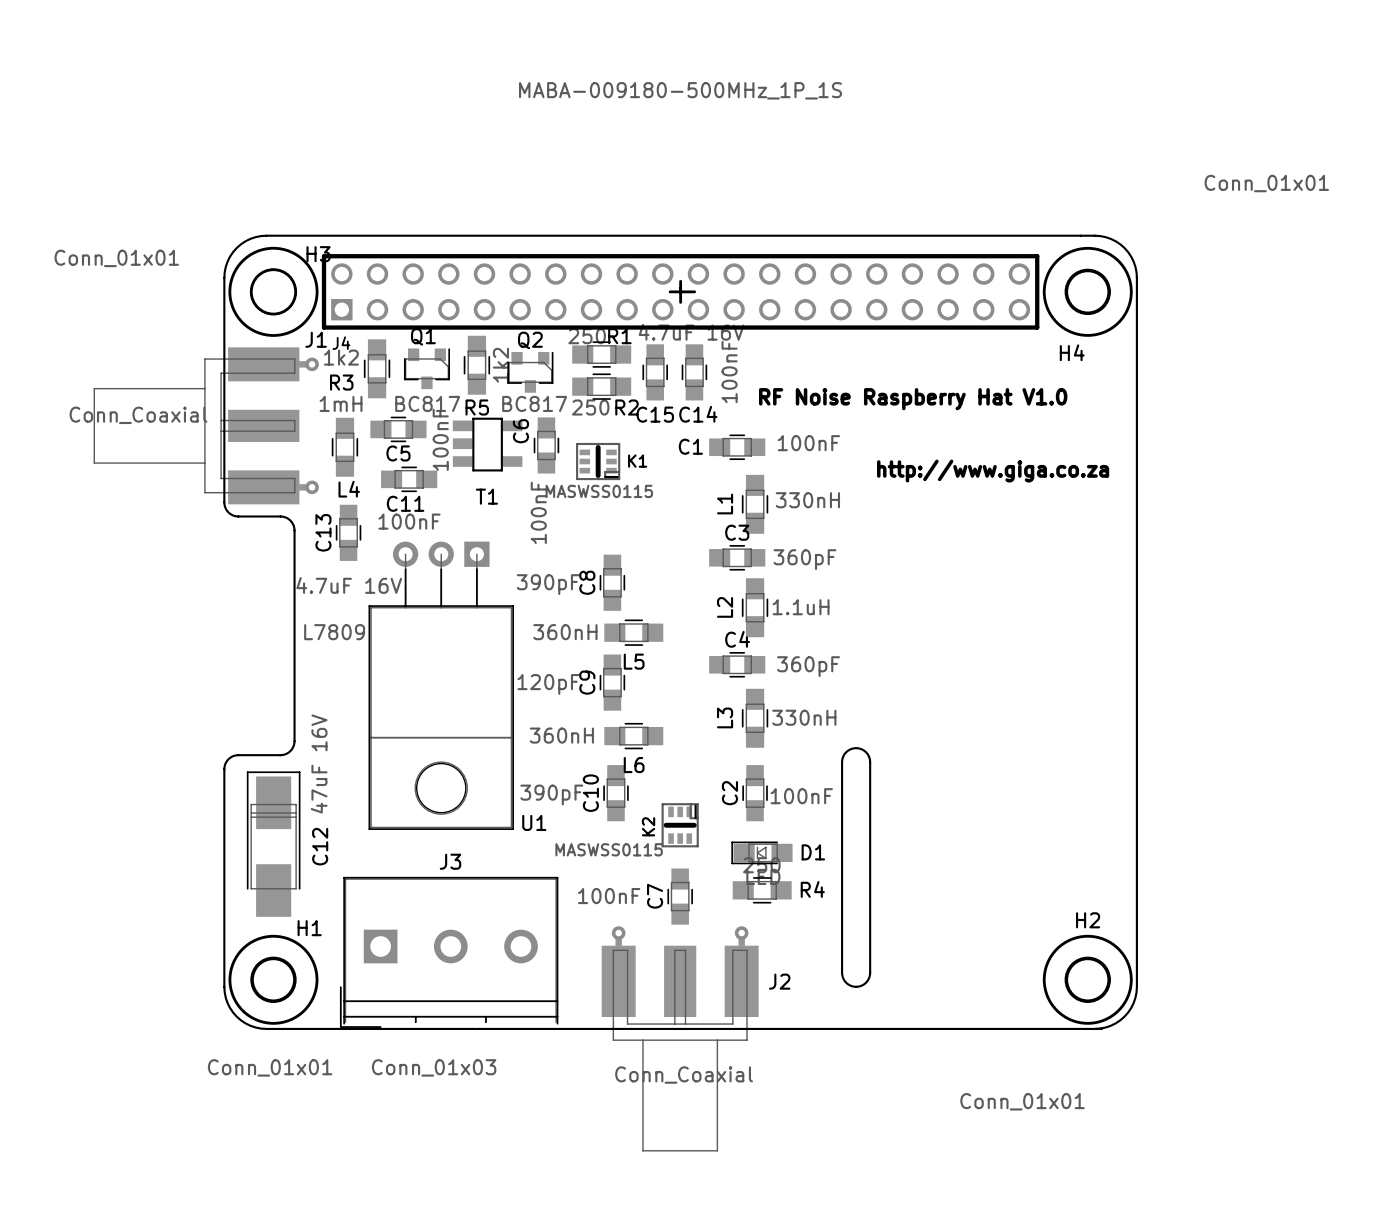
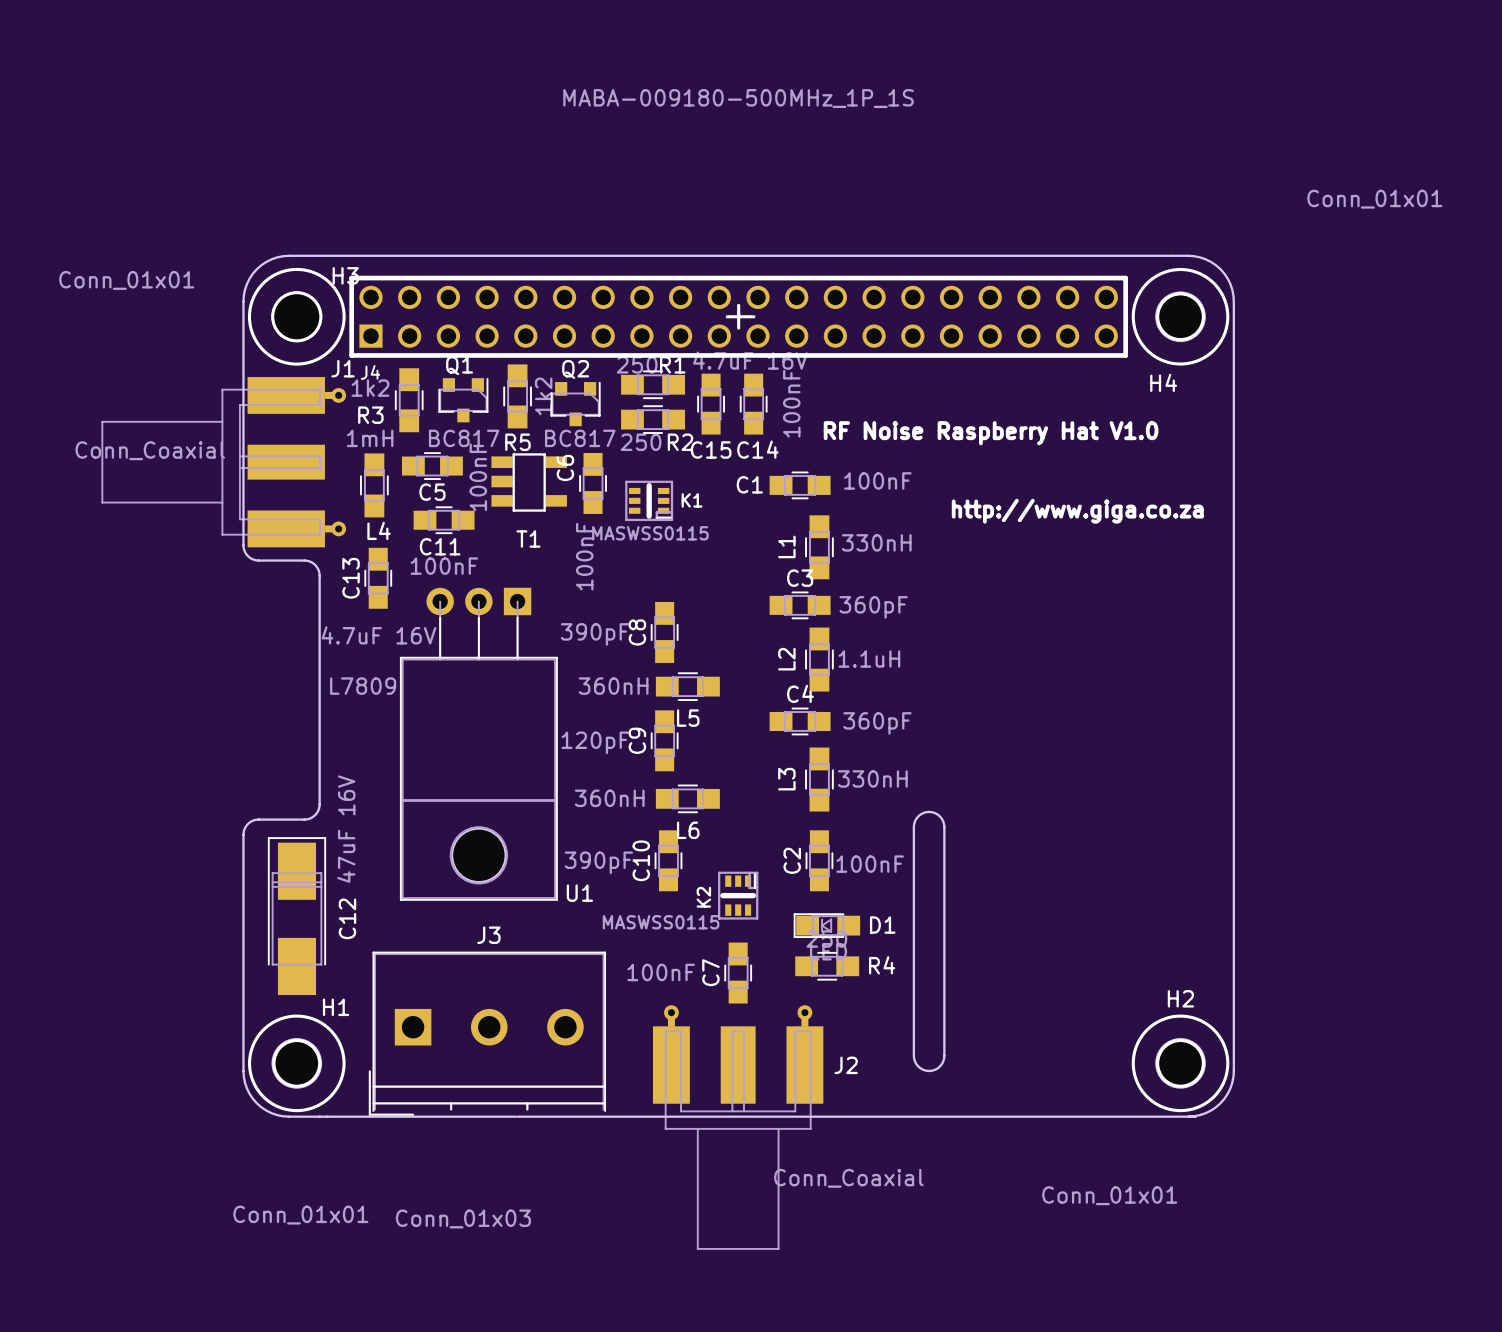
H1 value position: Conn_01x01 (270, 1067) -> Conn_01x01 (300, 1215)
J3 value position: Conn_01x03 (434, 1067) -> Conn_01x03 (463, 1218)
J2 value position: Conn_Coaxial (684, 1075) -> Conn_Coaxial (848, 1178)

